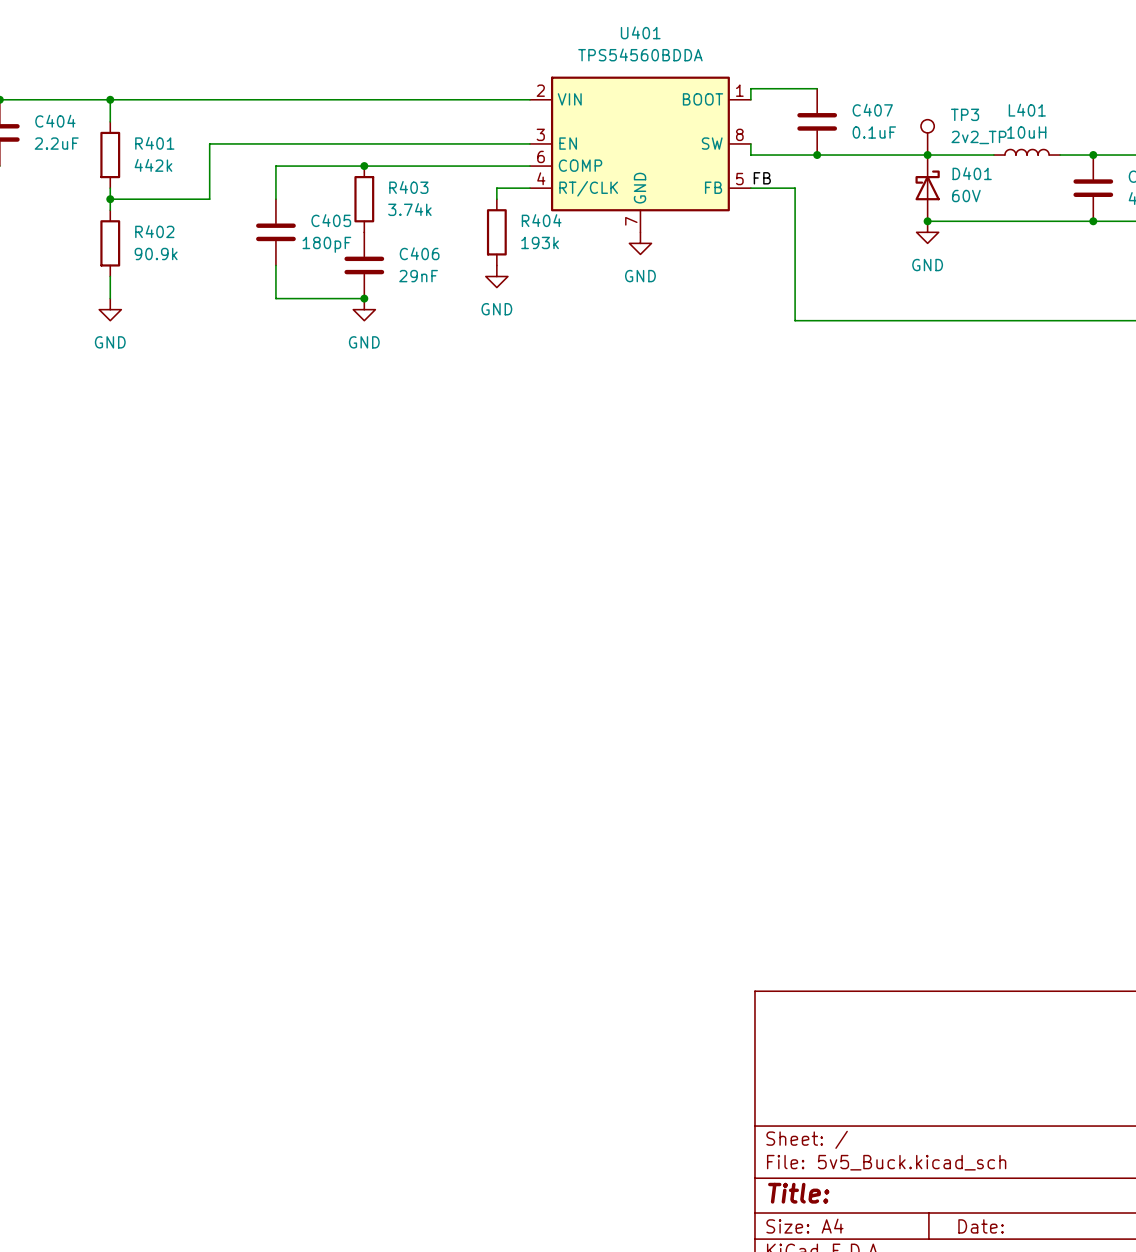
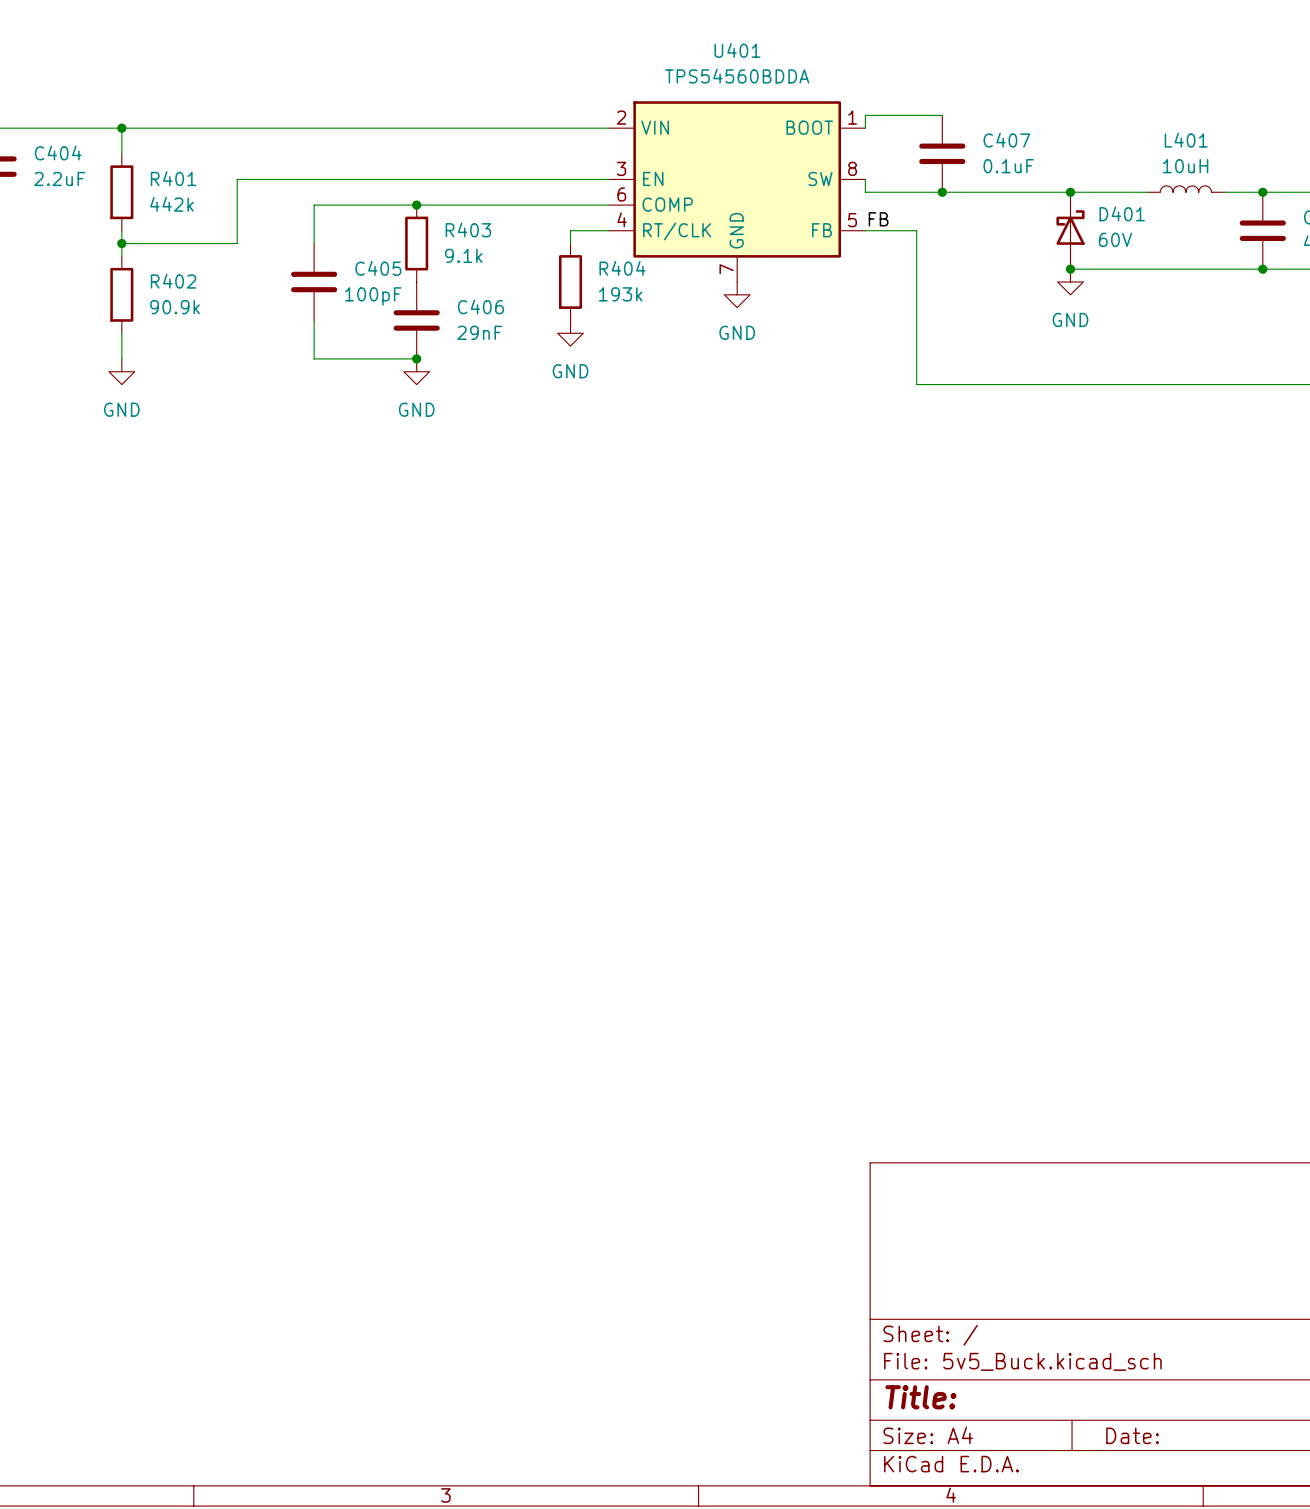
TP3: 2v2_TP (927, 137) -> none
R403 value: 3.74k (409, 209) -> 9.1k (463, 255)
C405 value: 180pF (326, 244) -> 100pF (373, 296)

